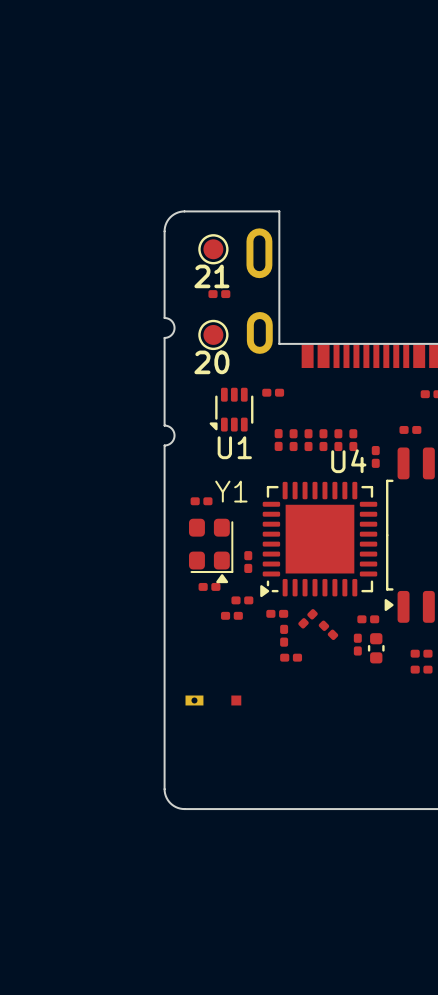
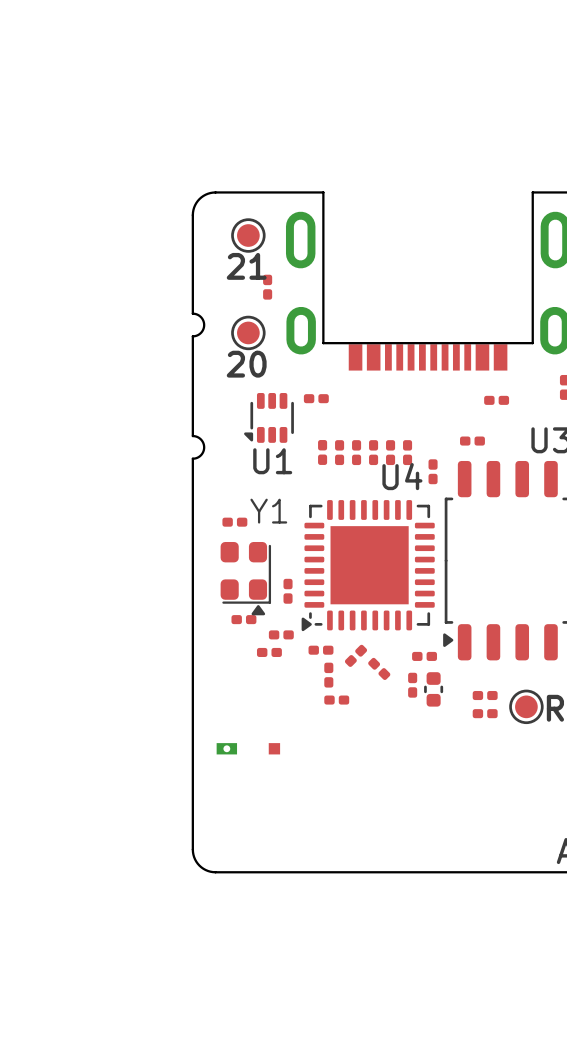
part rotation: 0° (219, 294) -> 90° clockwise (267, 287)

